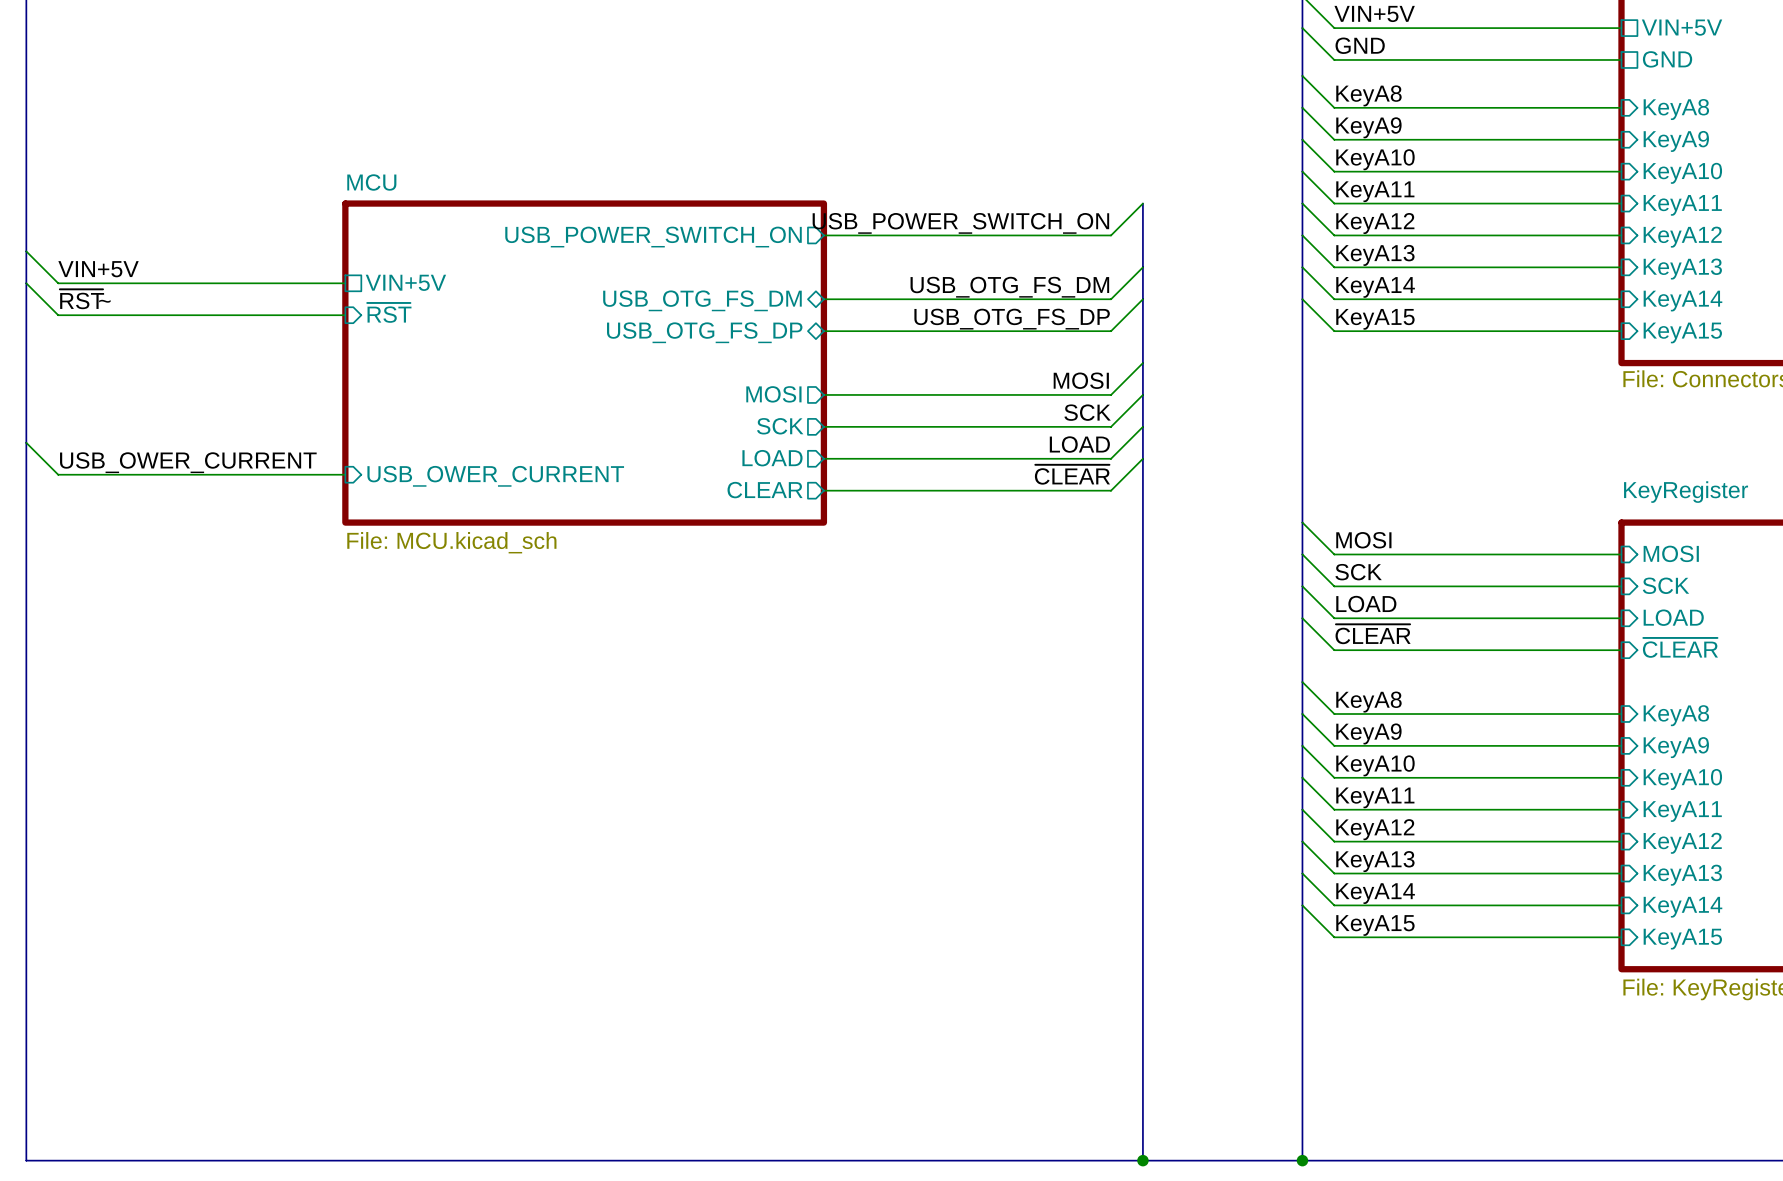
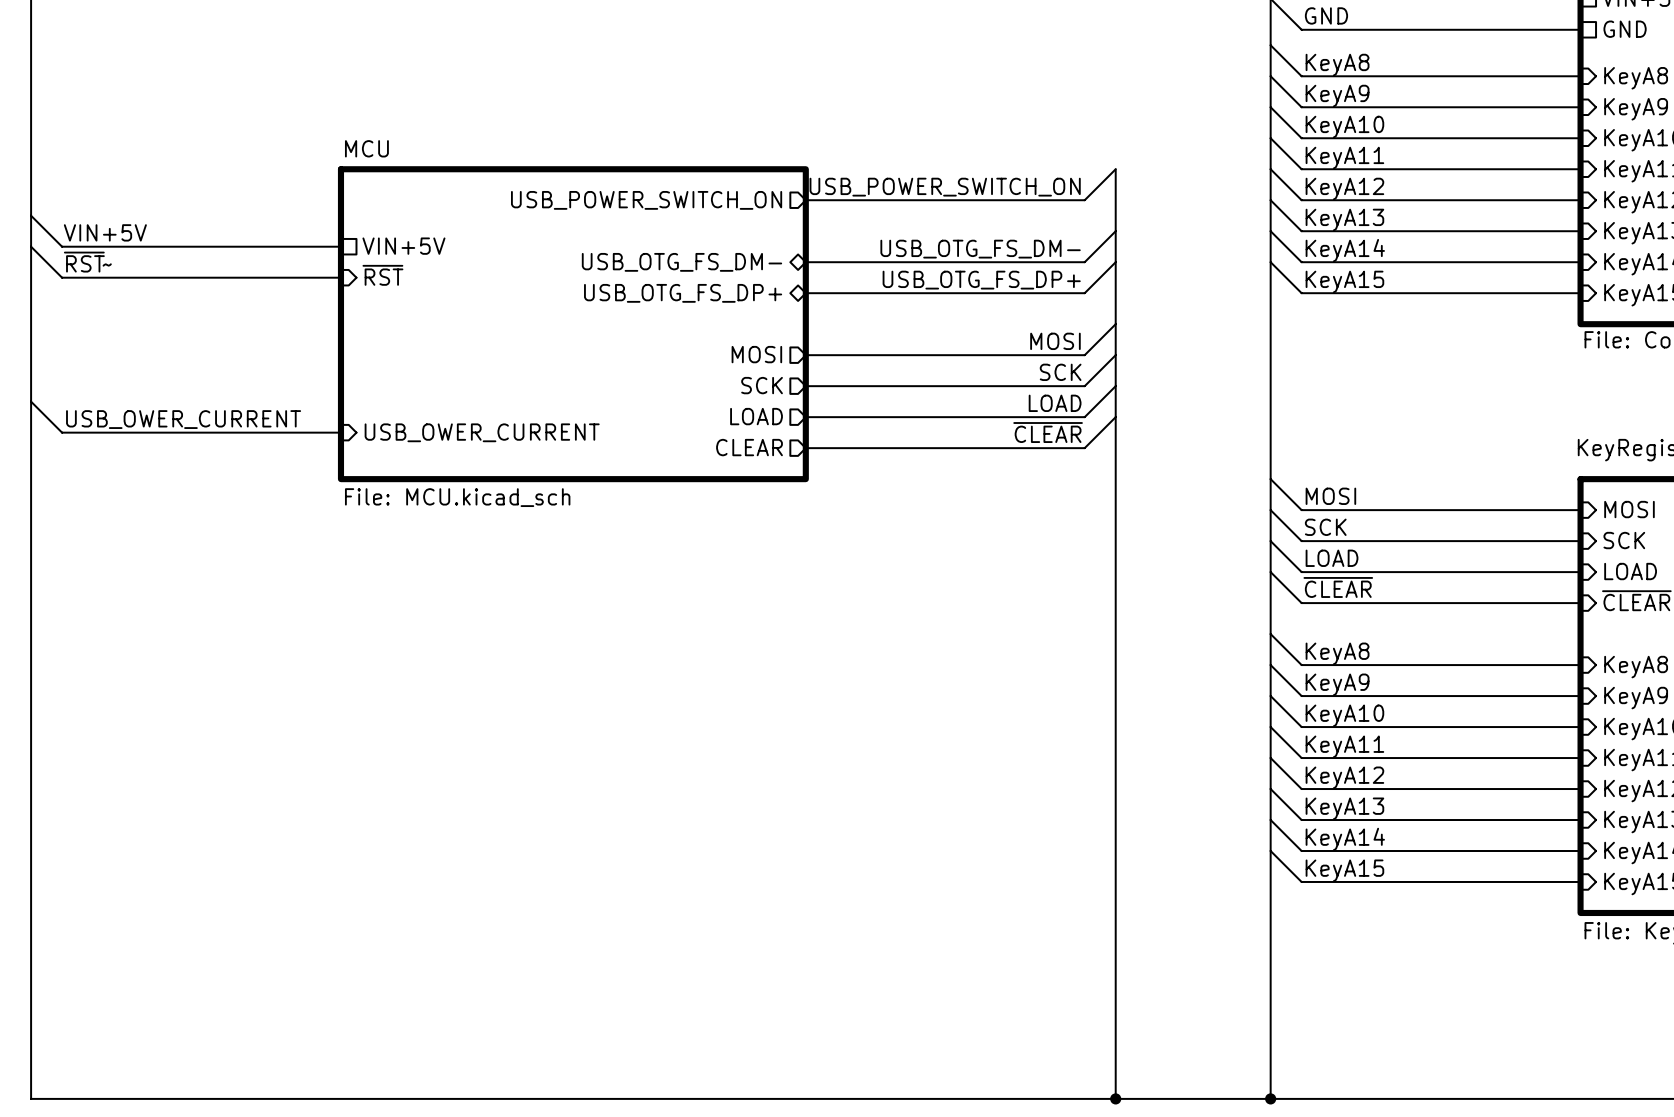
label: USB_OTG_FS_DM (1009, 287) -> USB_OTG_FS_DM- (980, 249)
sheet pin: USB_OTG_FS_DM (702, 300) -> USB_OTG_FS_DM- (681, 262)
label: USB_OTG_FS_DP (1012, 319) -> USB_OTG_FS_DP+ (981, 280)
sheet pin: USB_OTG_FS_DP (704, 332) -> USB_OTG_FS_DP+ (683, 293)

